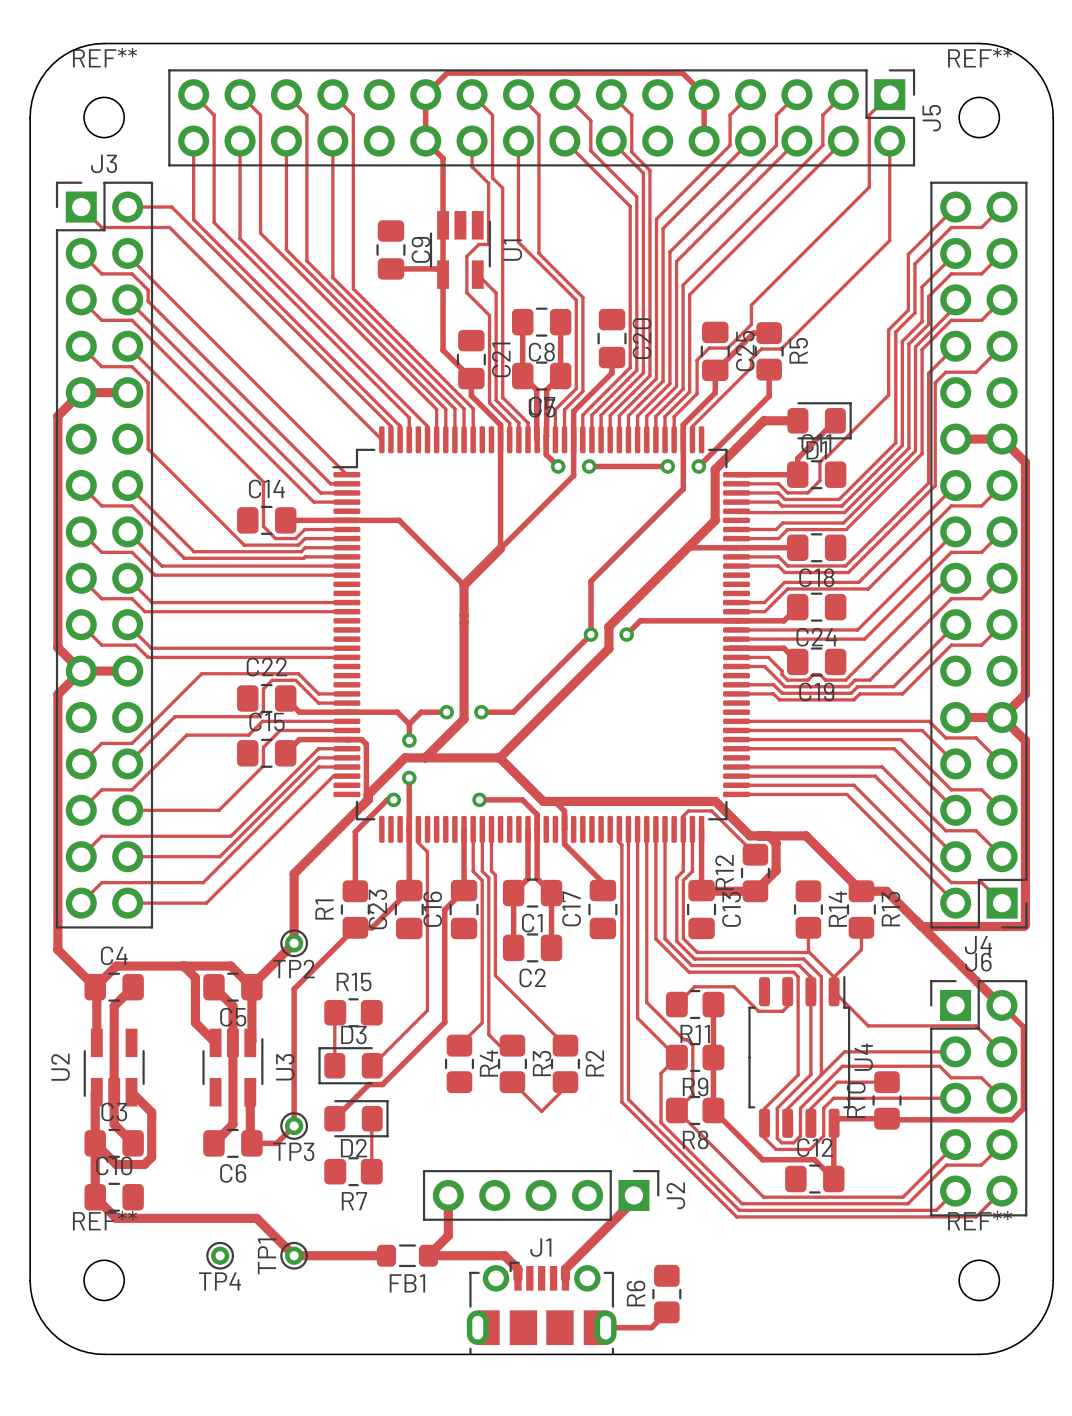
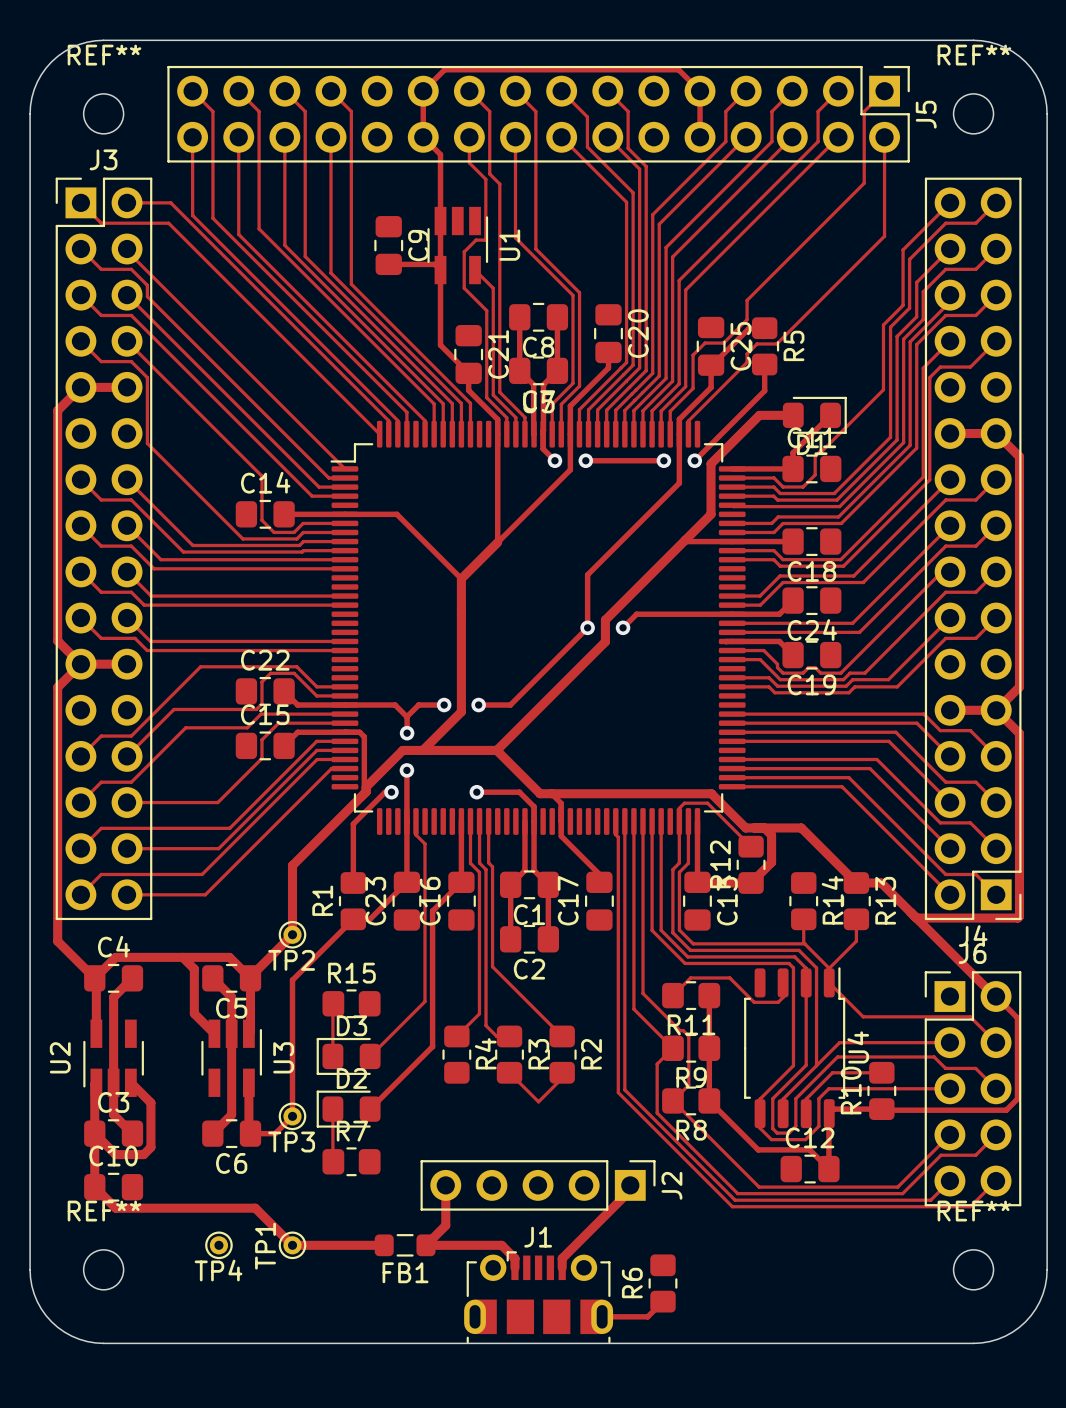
track: (444, 909) (444, 1022) (382, 1084) (368, 1084) (334, 1118) -> (442, 901) (432, 911) (432, 1046) (370, 1109)
track: none -> (332, 1109) (333, 1161)
D2 rotation: 0° (356, 1118) -> 180° (348, 1109)
track: (371, 1119) (371, 1171) -> none
R7 name position: R7 (354, 1201) -> R7 (352, 1131)

